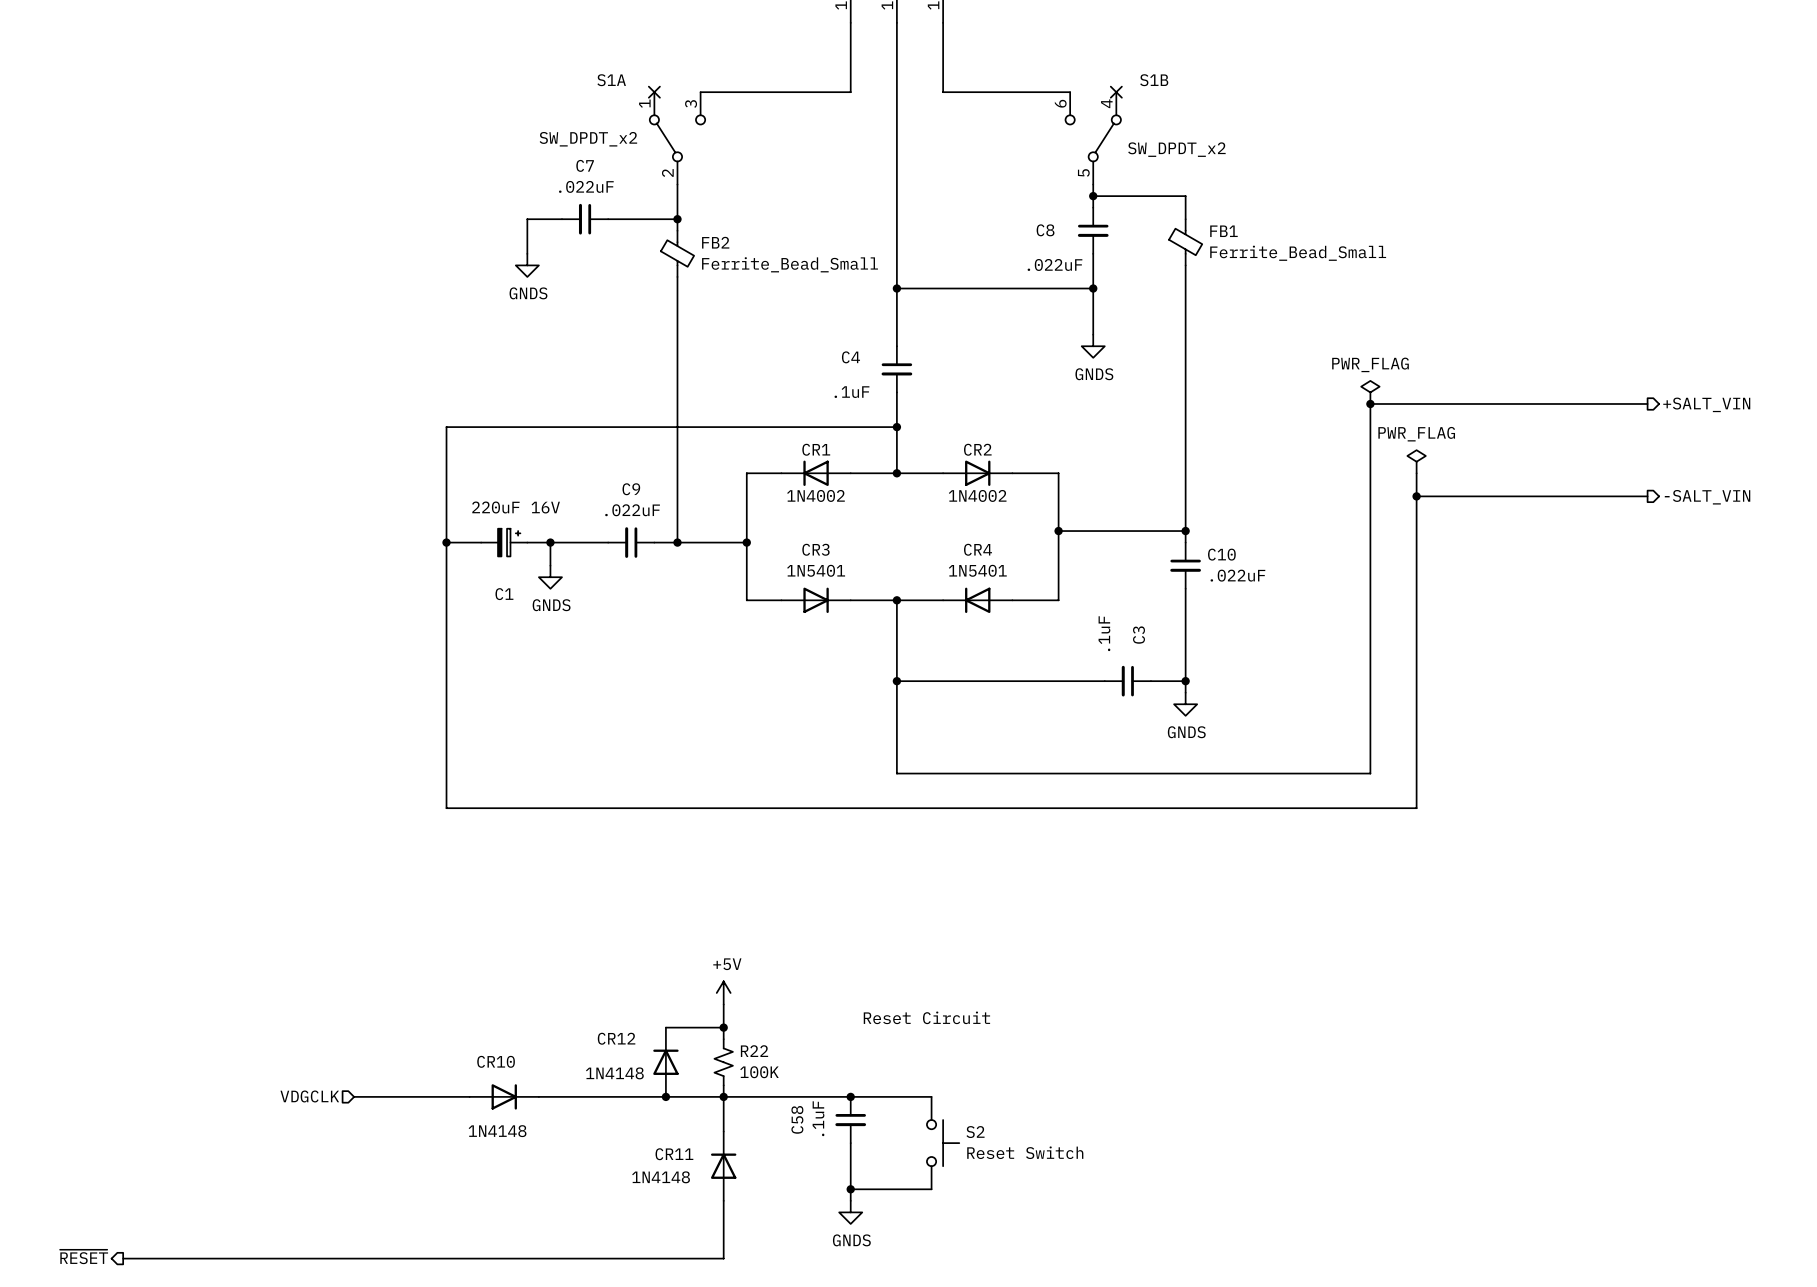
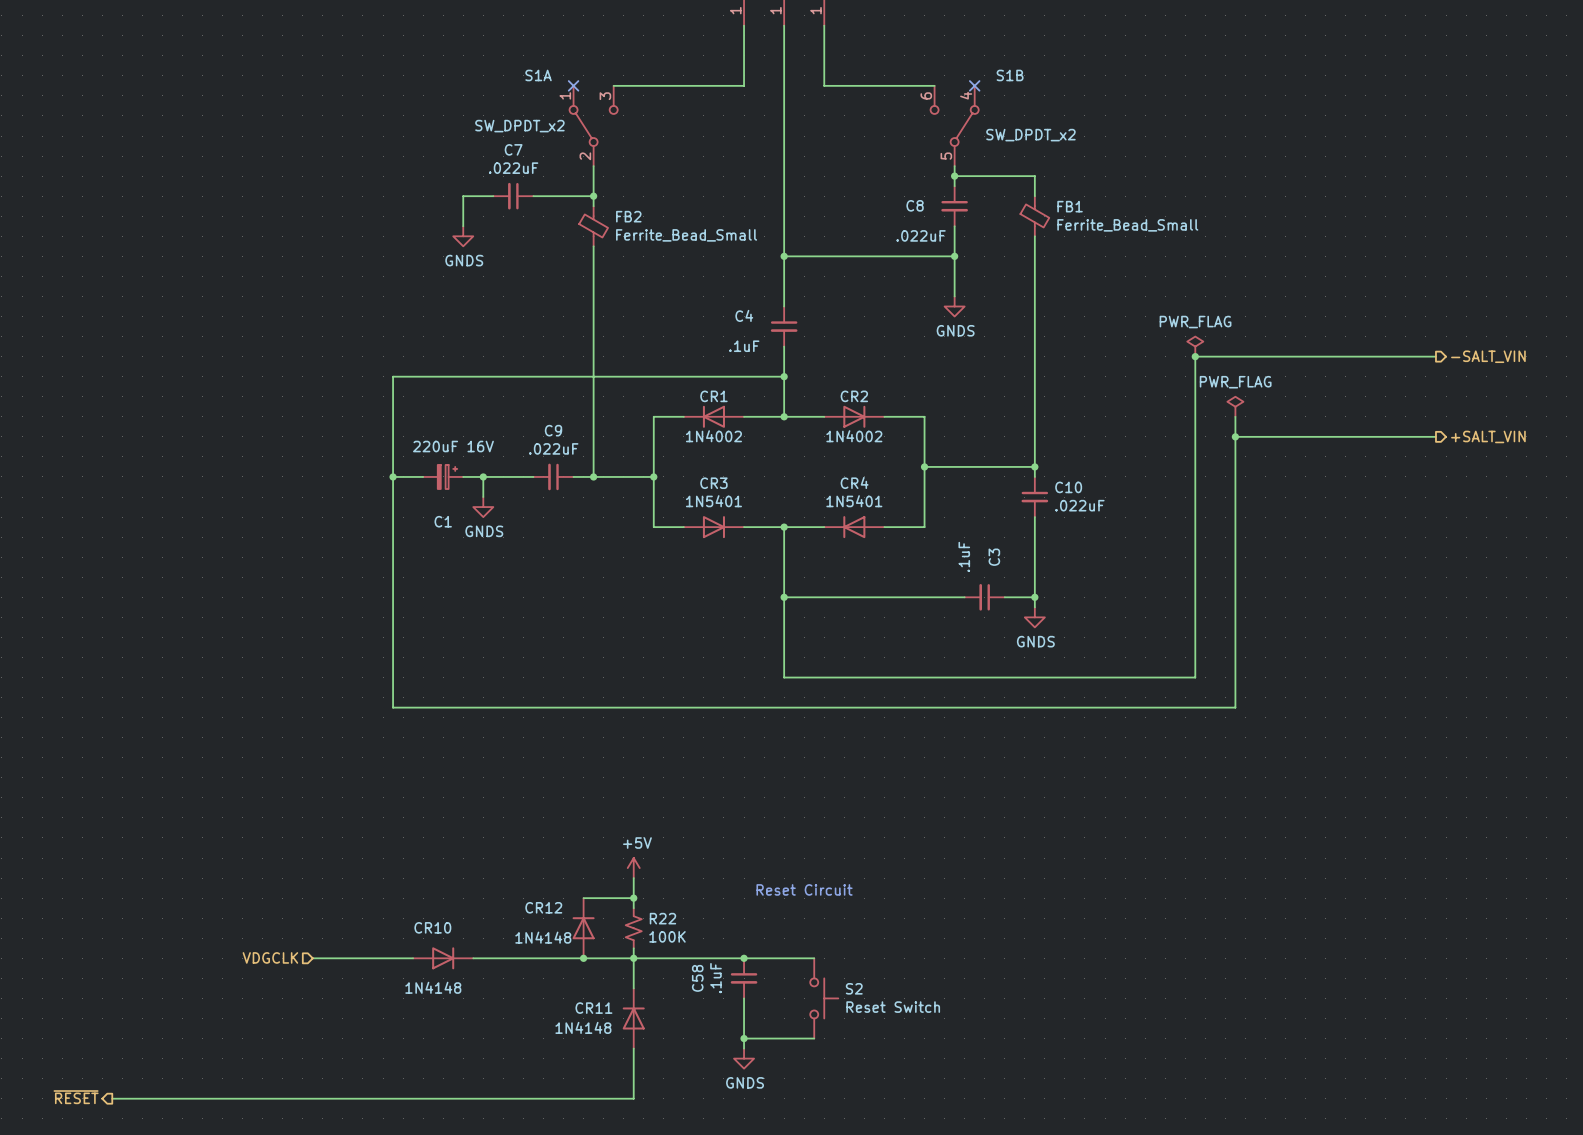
hierarchical label: +SALT_VIN (1706, 404) -> -SALT_VIN (1488, 356)
hierarchical label: -SALT_VIN (1707, 497) -> +SALT_VIN (1488, 436)

